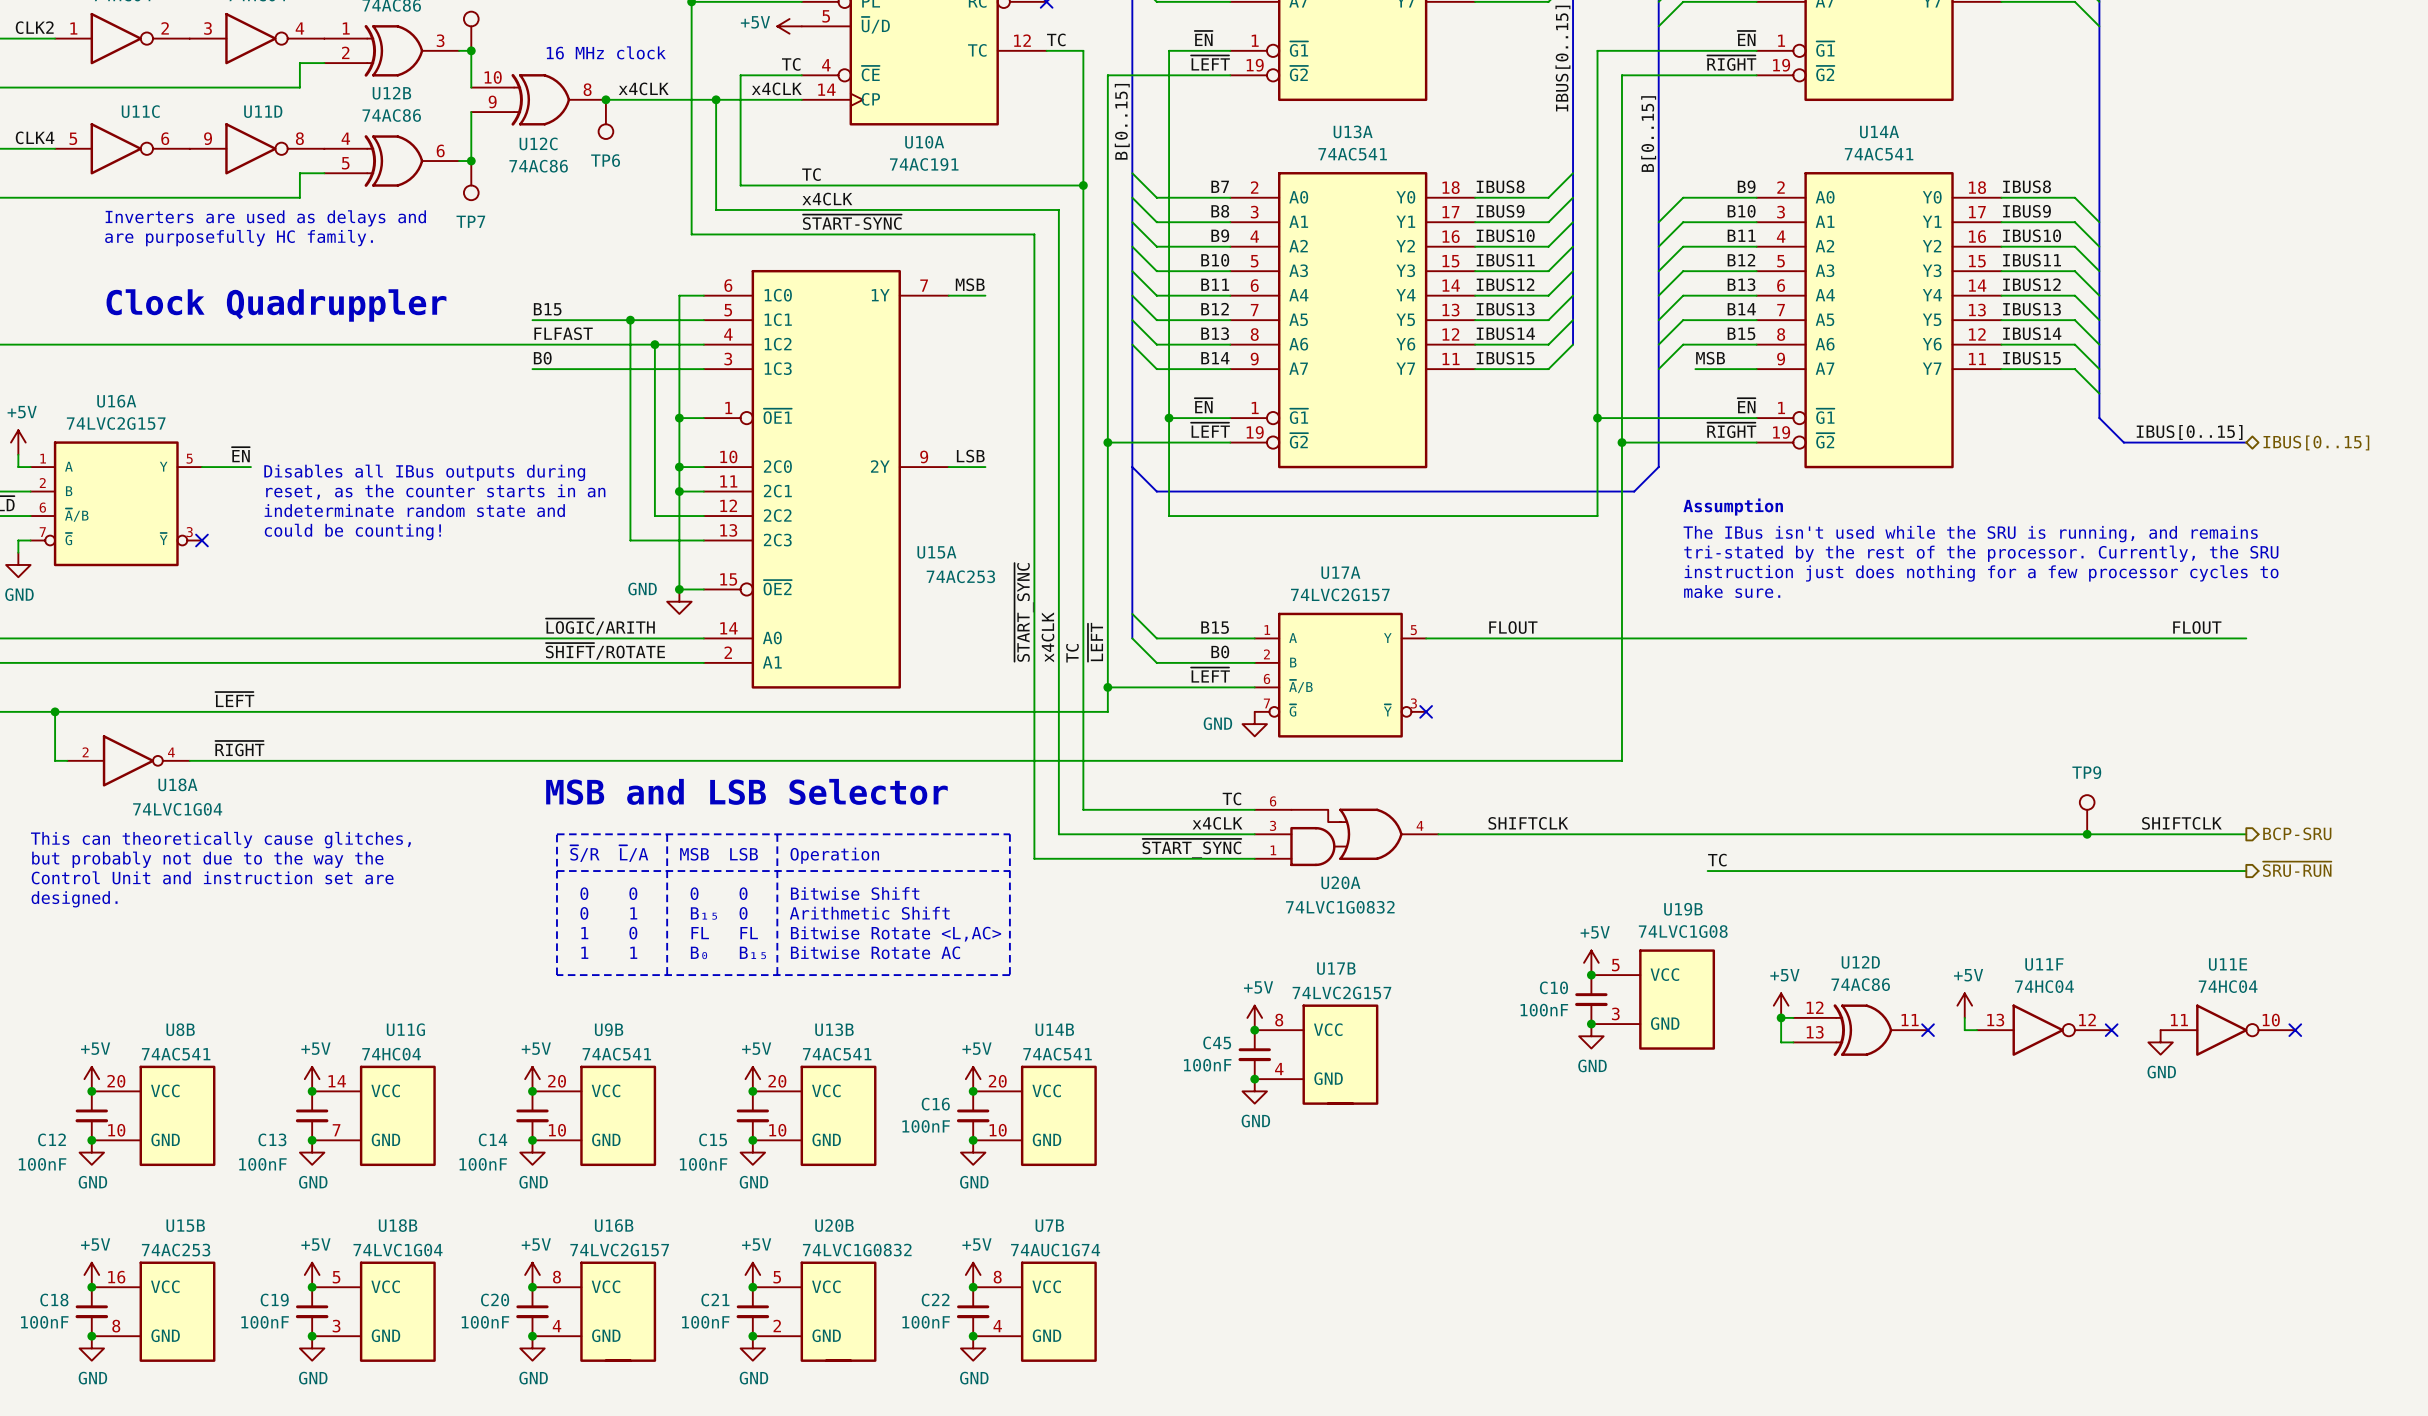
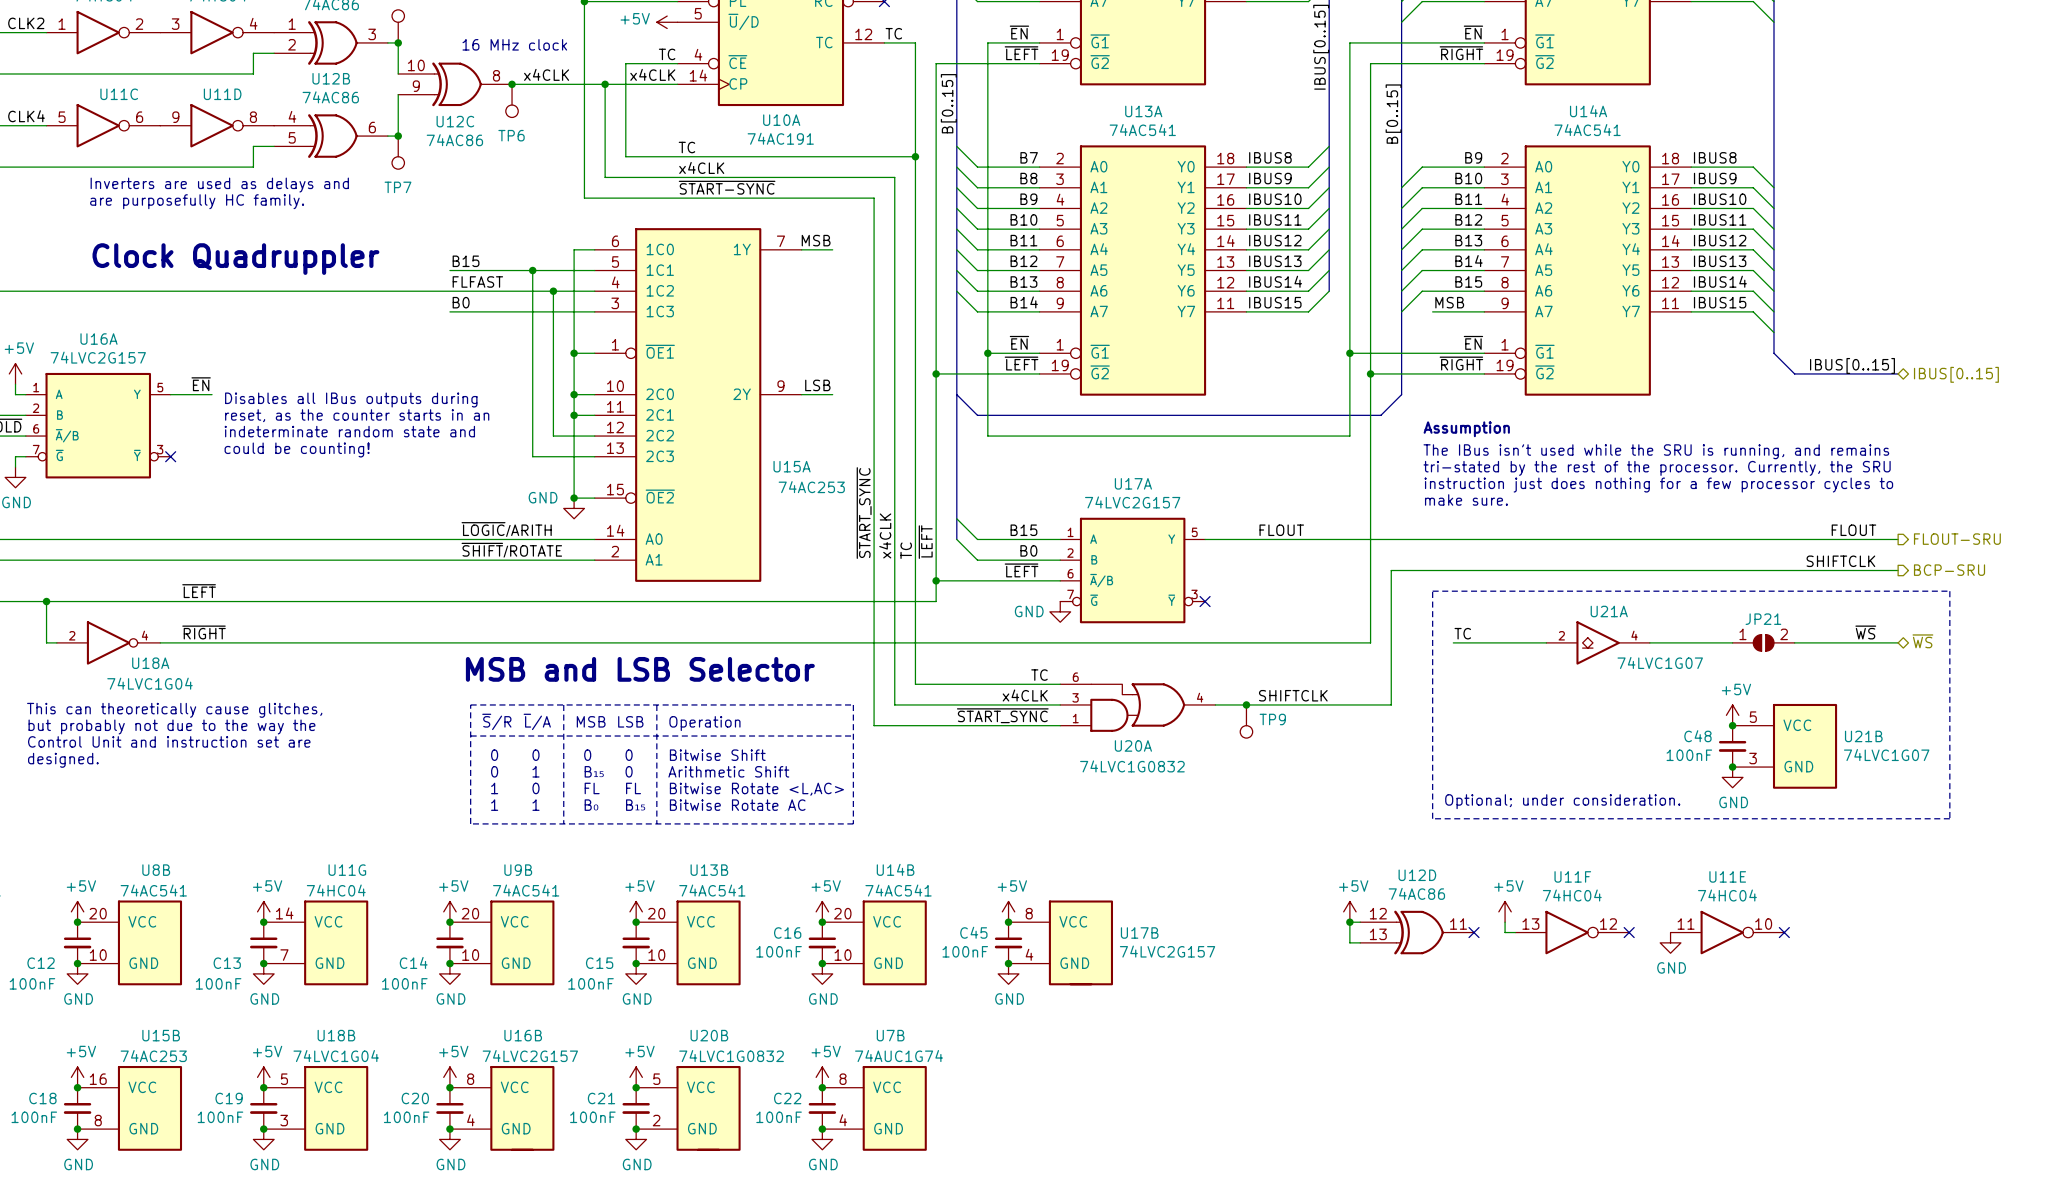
hierarchical label: none -> FLOUT-SRU (1957, 539)
line: none -> (1432, 591) (1949, 591) (1949, 818) (1432, 818) (1432, 591)
label: none -> ~{WS} (1865, 632)
hierarchical label: none -> ~{WS} (1922, 641)
wire: none -> (1453, 642) (1546, 642)
U21A: none -> 74LVC1G07 (1598, 642)
wire: none -> (1649, 642) (1732, 642)
JP21: none -> (1763, 642)
wire: none -> (1794, 642) (1898, 642)
TP9 name position: TP9 (2086, 772) -> TP9 (1272, 719)
TP9 rotation: 0° (2087, 802) -> 180° (1246, 731)
TP9 position: (2087, 814) -> (1246, 721)
label position: SHIFTCLK (2181, 823) -> SHIFTCLK (1840, 561)
hierarchical label position: BCP-SRU (2297, 833) -> BCP-SRU (1949, 570)
junction: none -> (1246, 704)
wire: (1646, 834) (2246, 834) -> (1391, 704) (1391, 570) (1898, 570)
junction: (2087, 834) -> none
power symbol: none -> +5V (1732, 715)
junction: none -> (1732, 725)
label position: TC (1717, 860) -> TC (1462, 633)
hierarchical label: ~{SRU-RUN} (2297, 869) -> none
wire: (1707, 871) (2246, 871) -> none
C48: none -> 100nF (1732, 746)
U21B: none -> 74LVC1G07 (1784, 746)
junction: none -> (1732, 767)
power symbol: none -> GND (1732, 777)
text: none -> Optional; under consideration. (1562, 801)
power symbol: +5V (1591, 962) -> none
U17B name position: U17B (1336, 968) -> U17B (1139, 932)
junction: (1591, 975) -> none
U17B value position: 74LVC2G157 (1341, 992) -> 74LVC2G157 (1167, 951)
C10: 100nF (1591, 999) -> none
U19B: 74LVC1G08 (1653, 999) -> none
power symbol position: +5V (1781, 1005) -> +5V (1505, 911)
power symbol: +5V (1964, 1005) -> none
power symbol position: +5V (1254, 1017) -> +5V (1008, 911)
junction: (1781, 1017) -> none
wire: (1793, 1017) (1781, 1017) (1781, 1042) (1793, 1042) -> (1360, 922) (1349, 922) (1349, 942) (1360, 942)
wire: (1964, 1017) (1964, 1030) (1976, 1030) -> (1505, 922) (1505, 932) (1515, 932)
junction: (1591, 1024) -> none
junction: (1254, 1030) -> none
U12D position: (1860, 1030) -> (1417, 932)
no-connect mark: (1928, 1030) -> none
U11F position: (2044, 1030) -> (1572, 932)
no-connect mark: (2111, 1030) -> none
U11E position: (2227, 1030) -> (1727, 932)
no-connect mark: (2295, 1030) -> none
power symbol: GND (1591, 1036) -> none
power symbol: GND (2160, 1042) -> none
C45 position: (1254, 1054) -> (1008, 942)
U17B position: (1316, 1054) -> (1060, 942)
junction: (1254, 1079) -> none
power symbol: none -> +5V (1349, 911)
junction: none -> (1008, 922)
power symbol position: GND (1254, 1091) -> GND (1008, 973)
junction: none -> (1349, 922)
no-connect mark: none -> (1474, 932)
no-connect mark: none -> (1629, 932)
no-connect mark: none -> (1784, 932)
power symbol: none -> GND (1670, 942)
junction: none -> (1008, 963)

